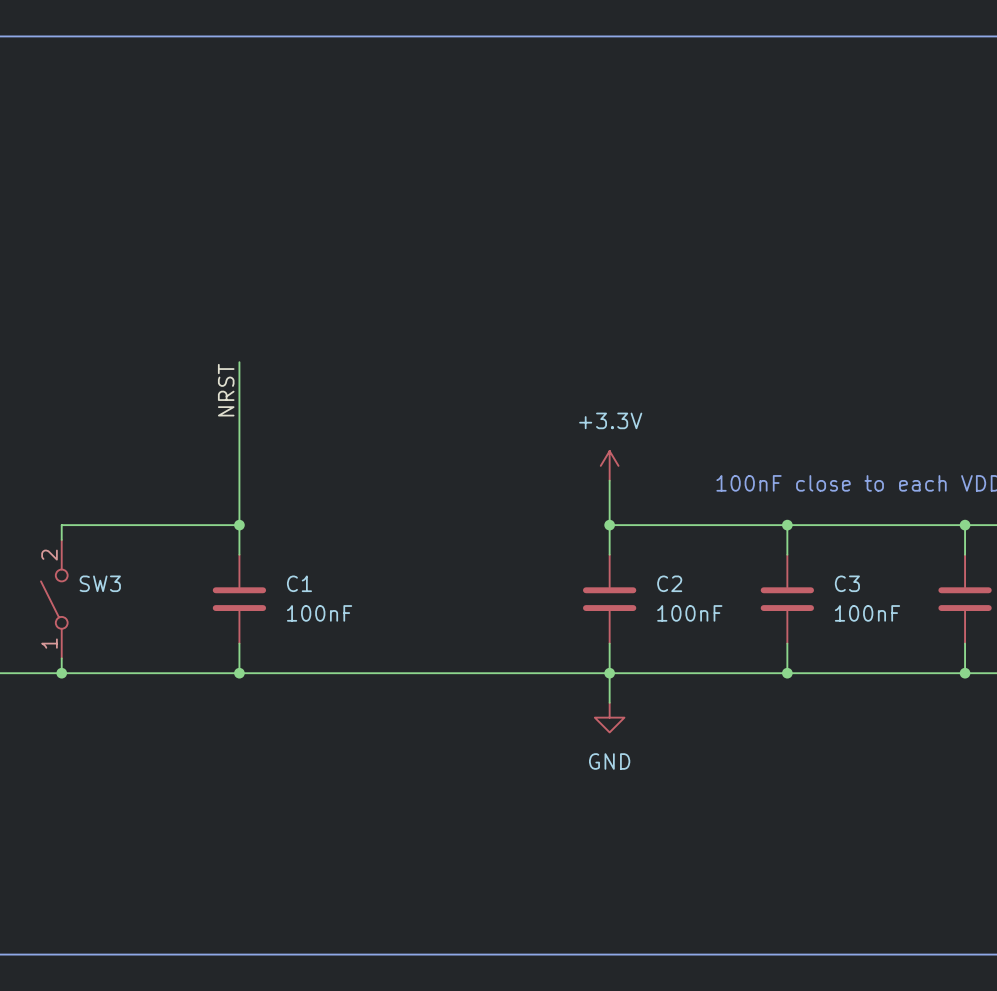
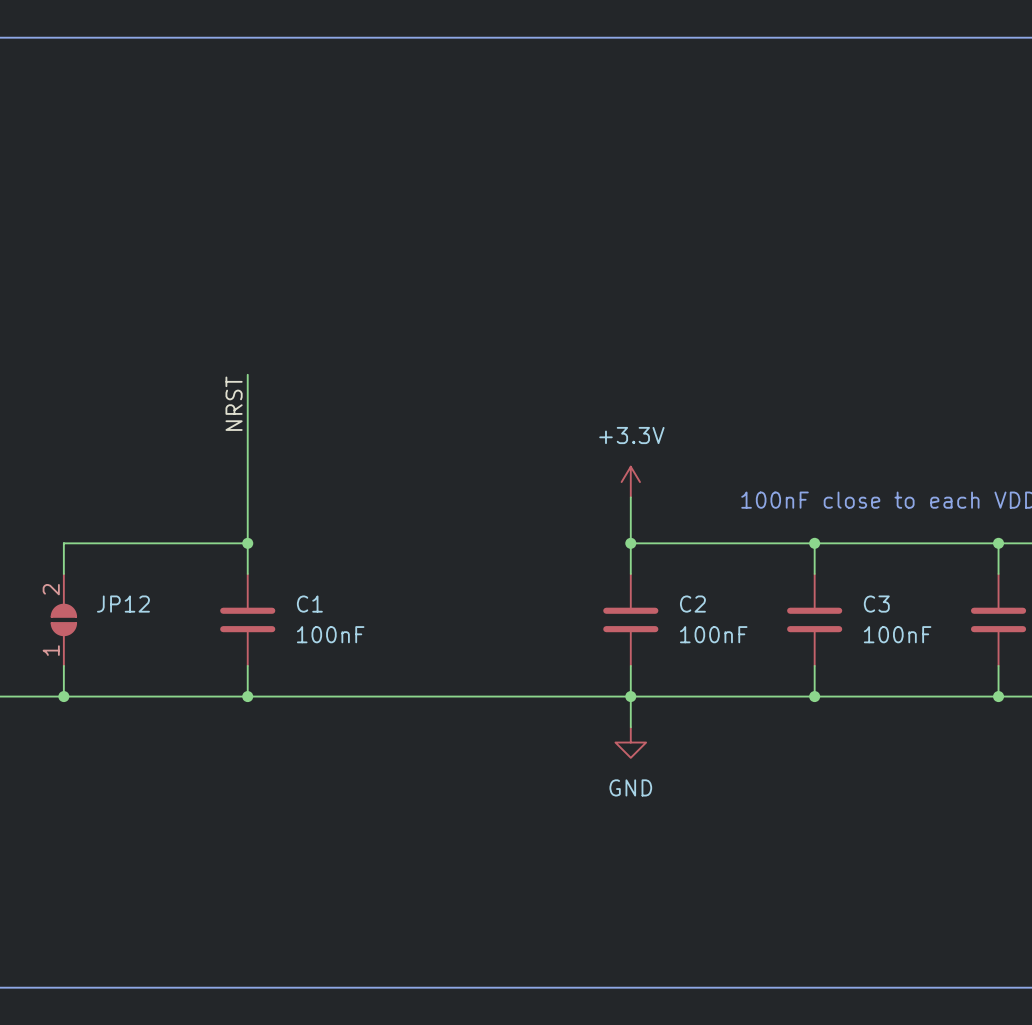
SW3: (54, 599) -> none
JP12: none -> (63, 619)

